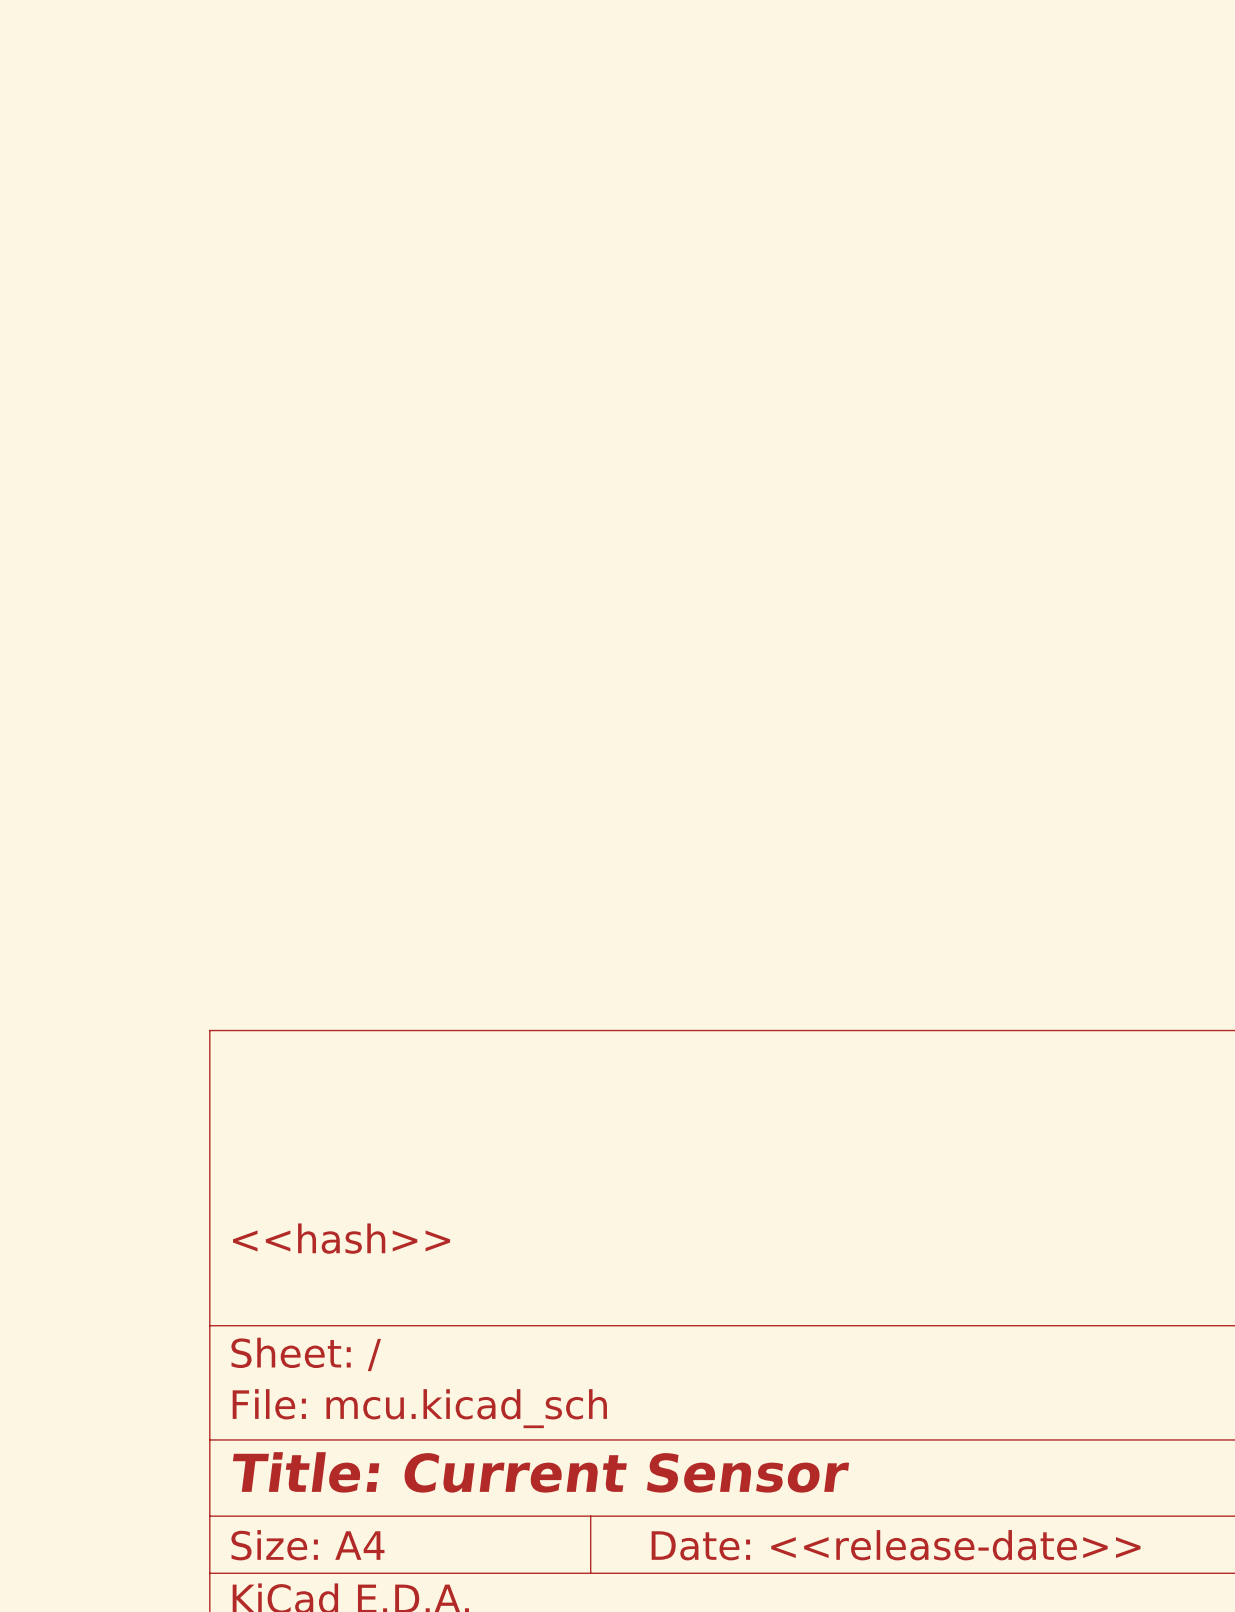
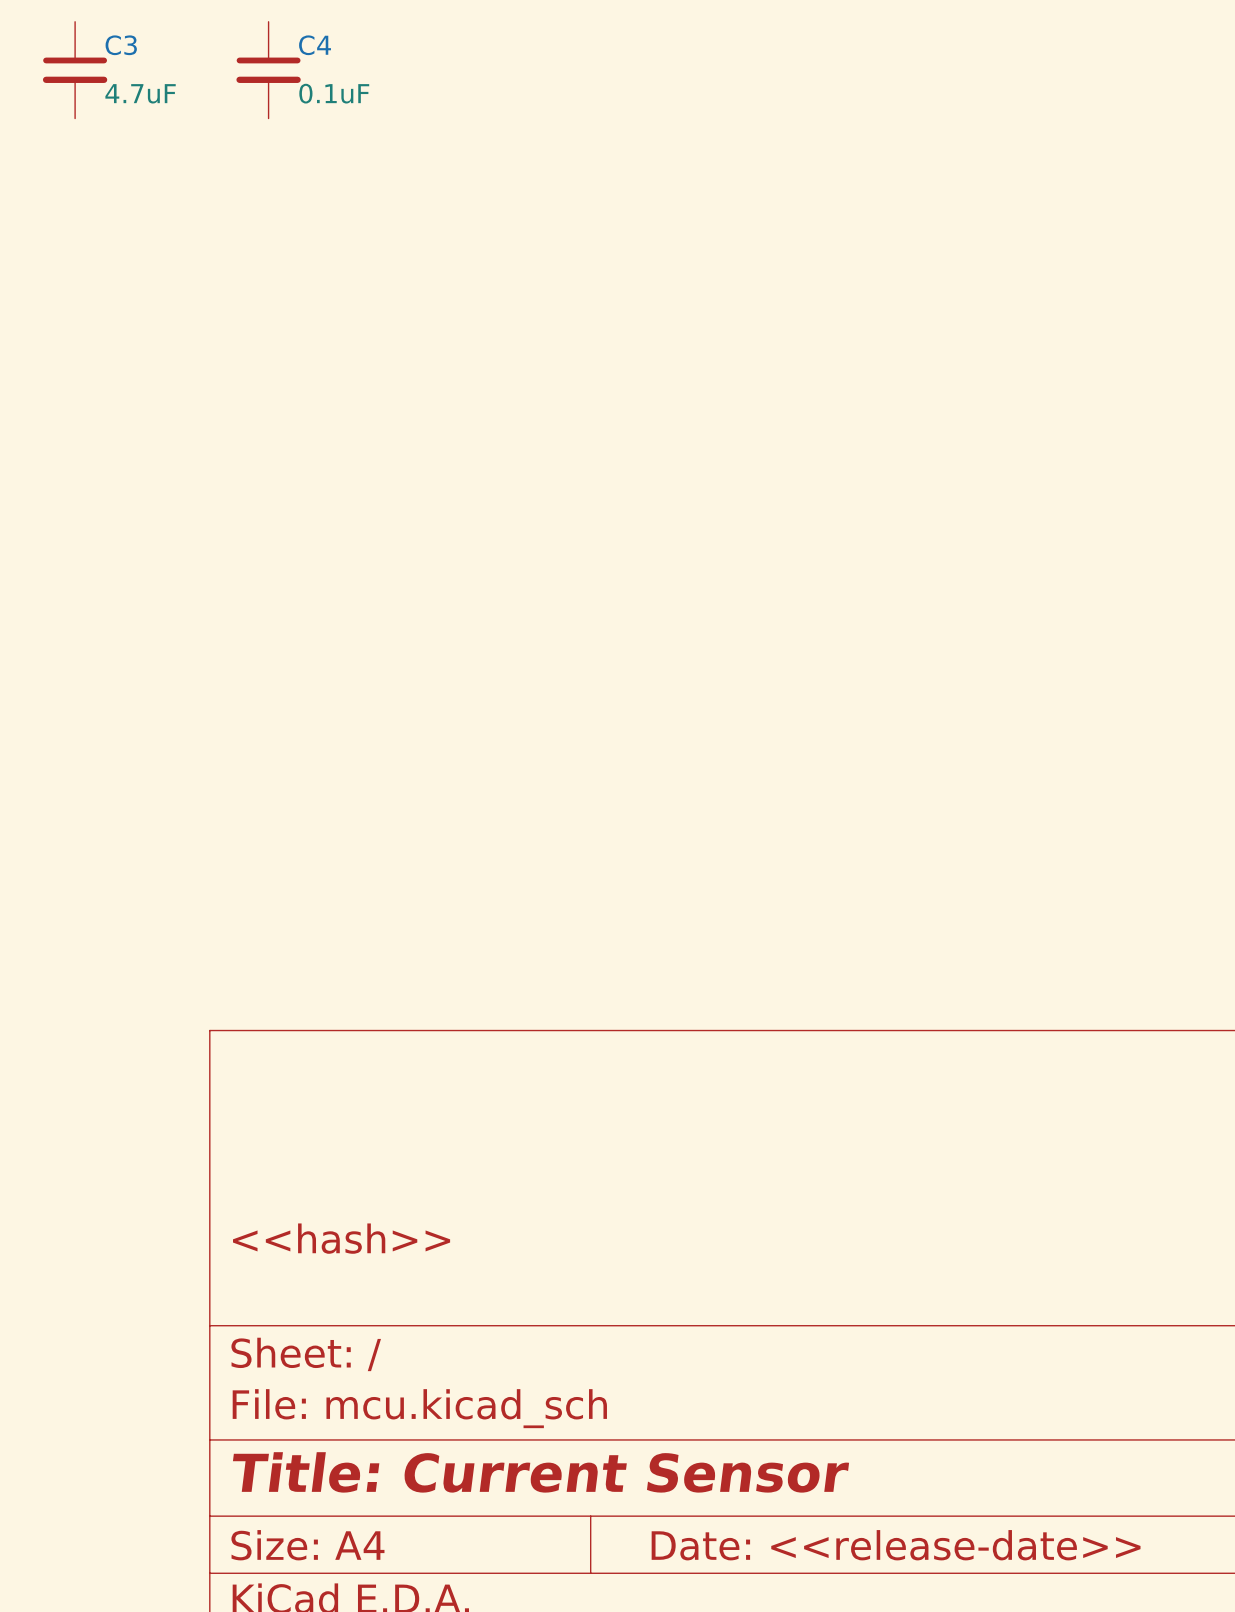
C3: none -> 4.7uF (75, 70)
C4: none -> 0.1uF (268, 70)

